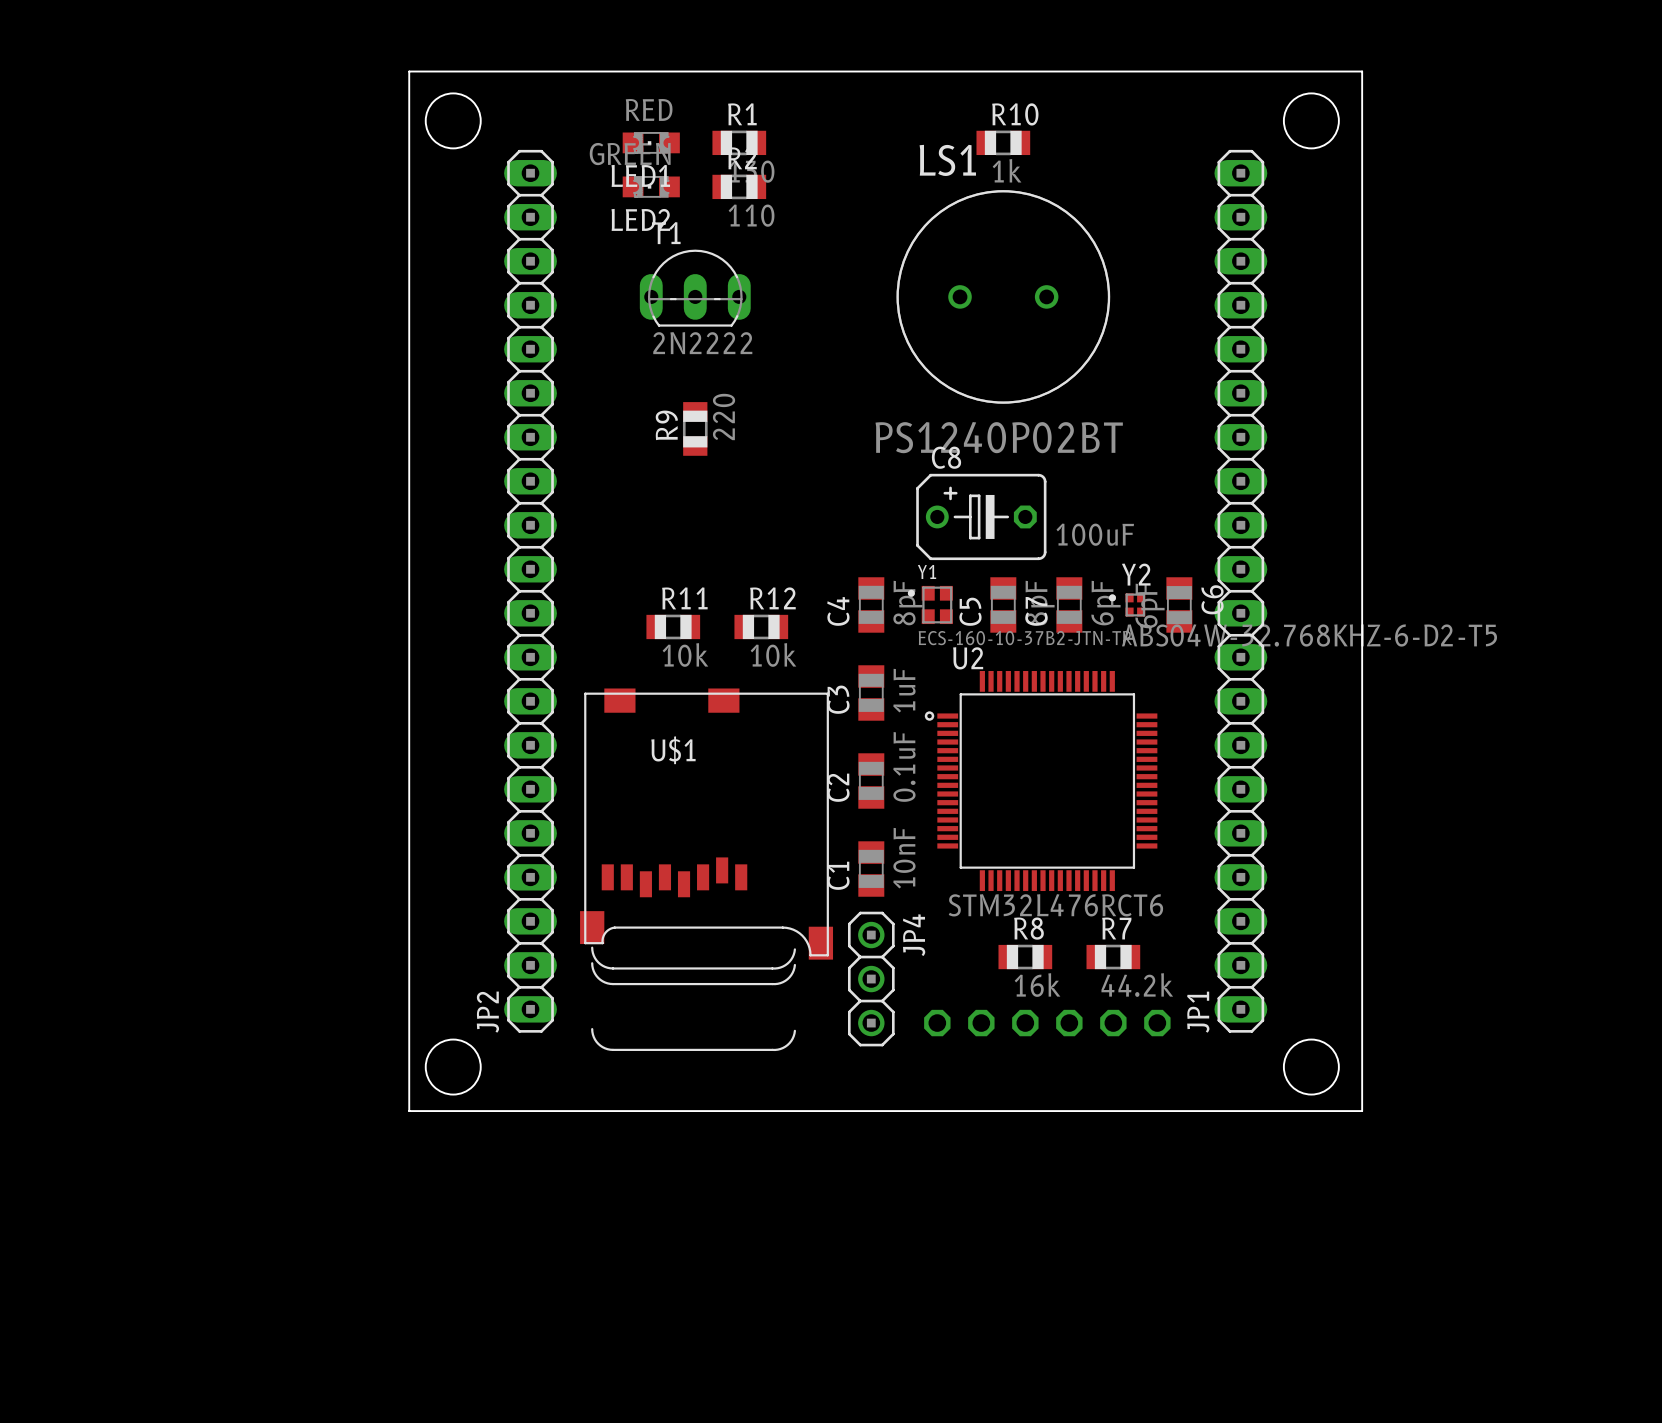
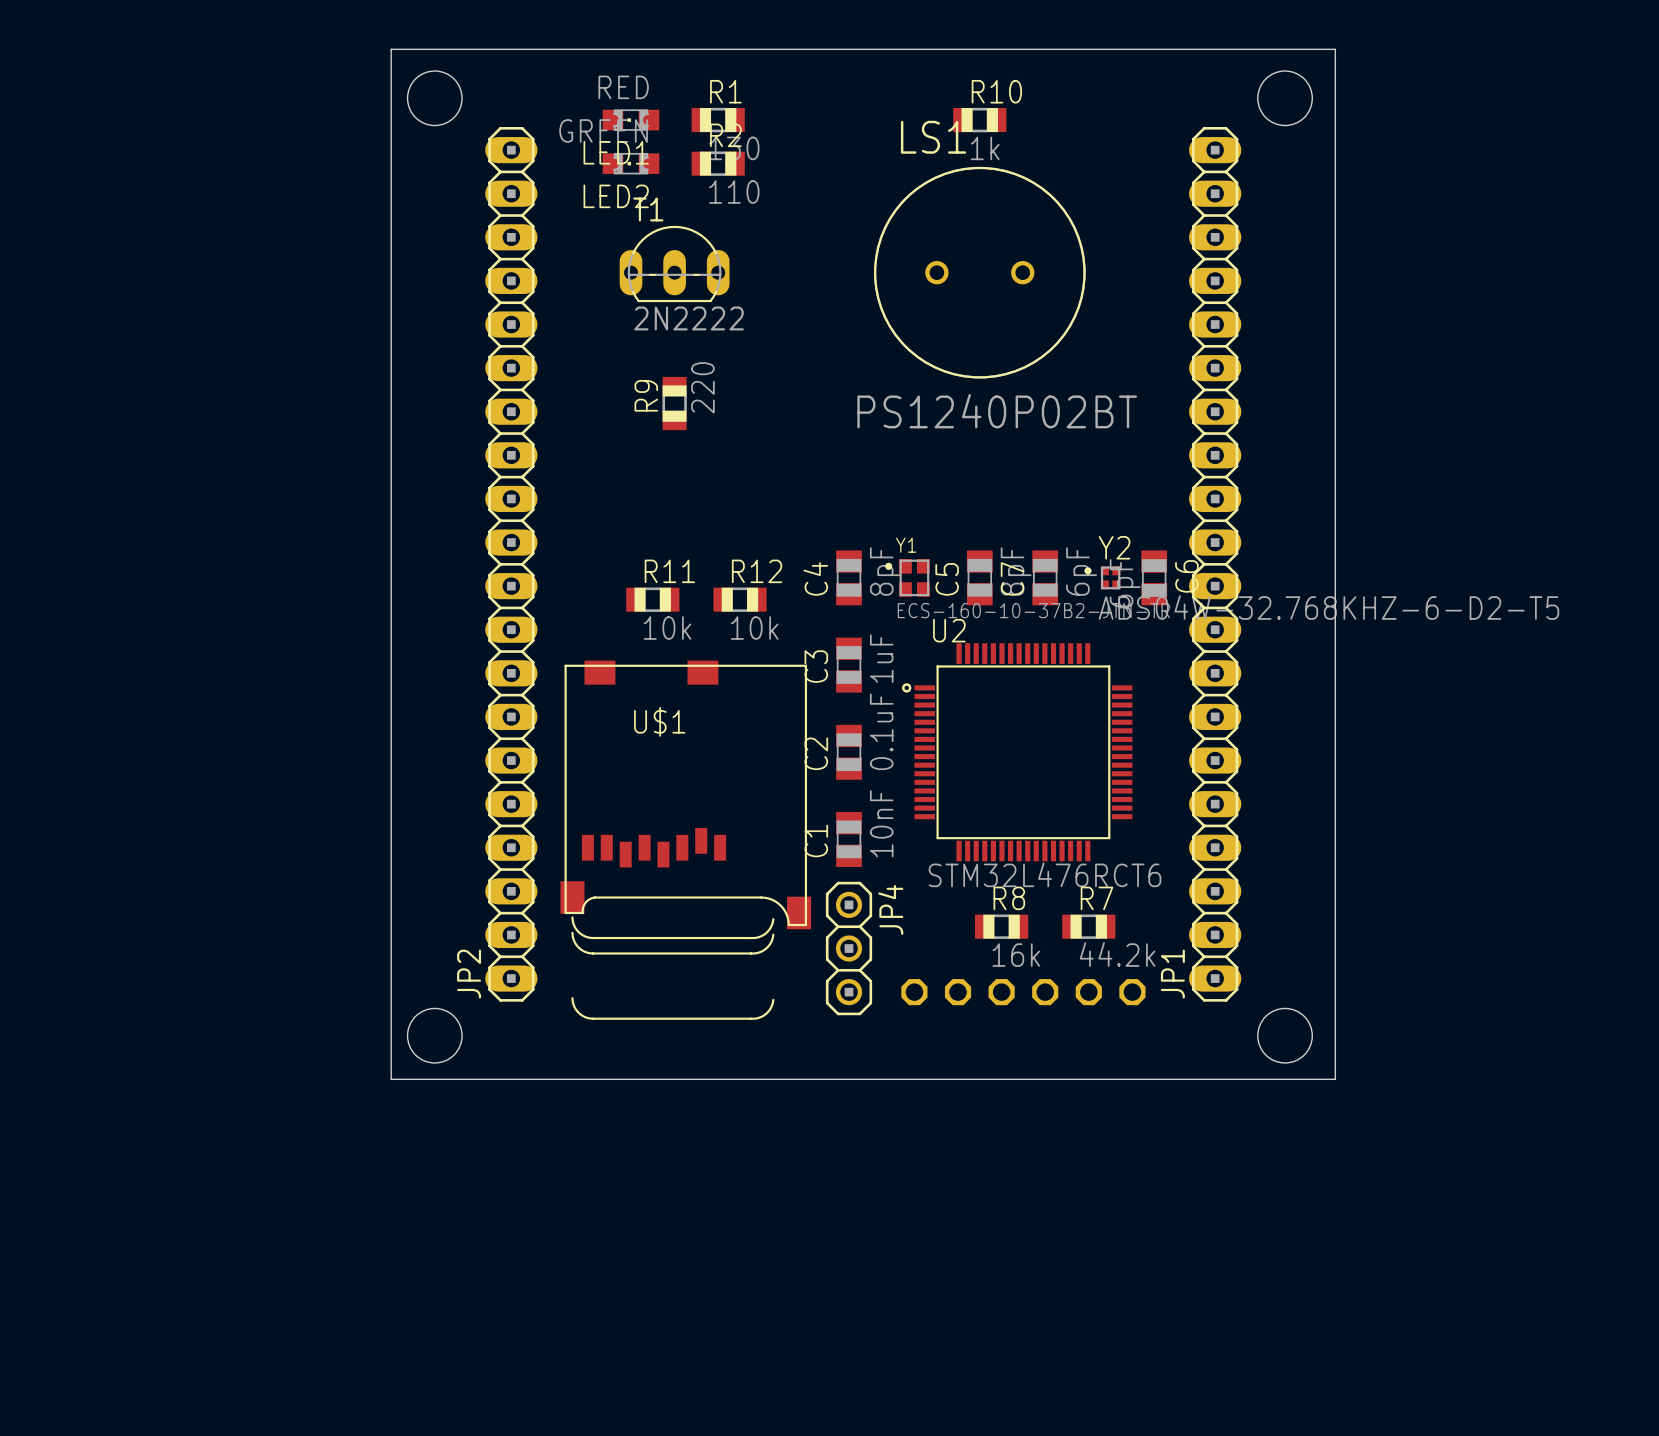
C8: 100uF (981, 516) -> none

